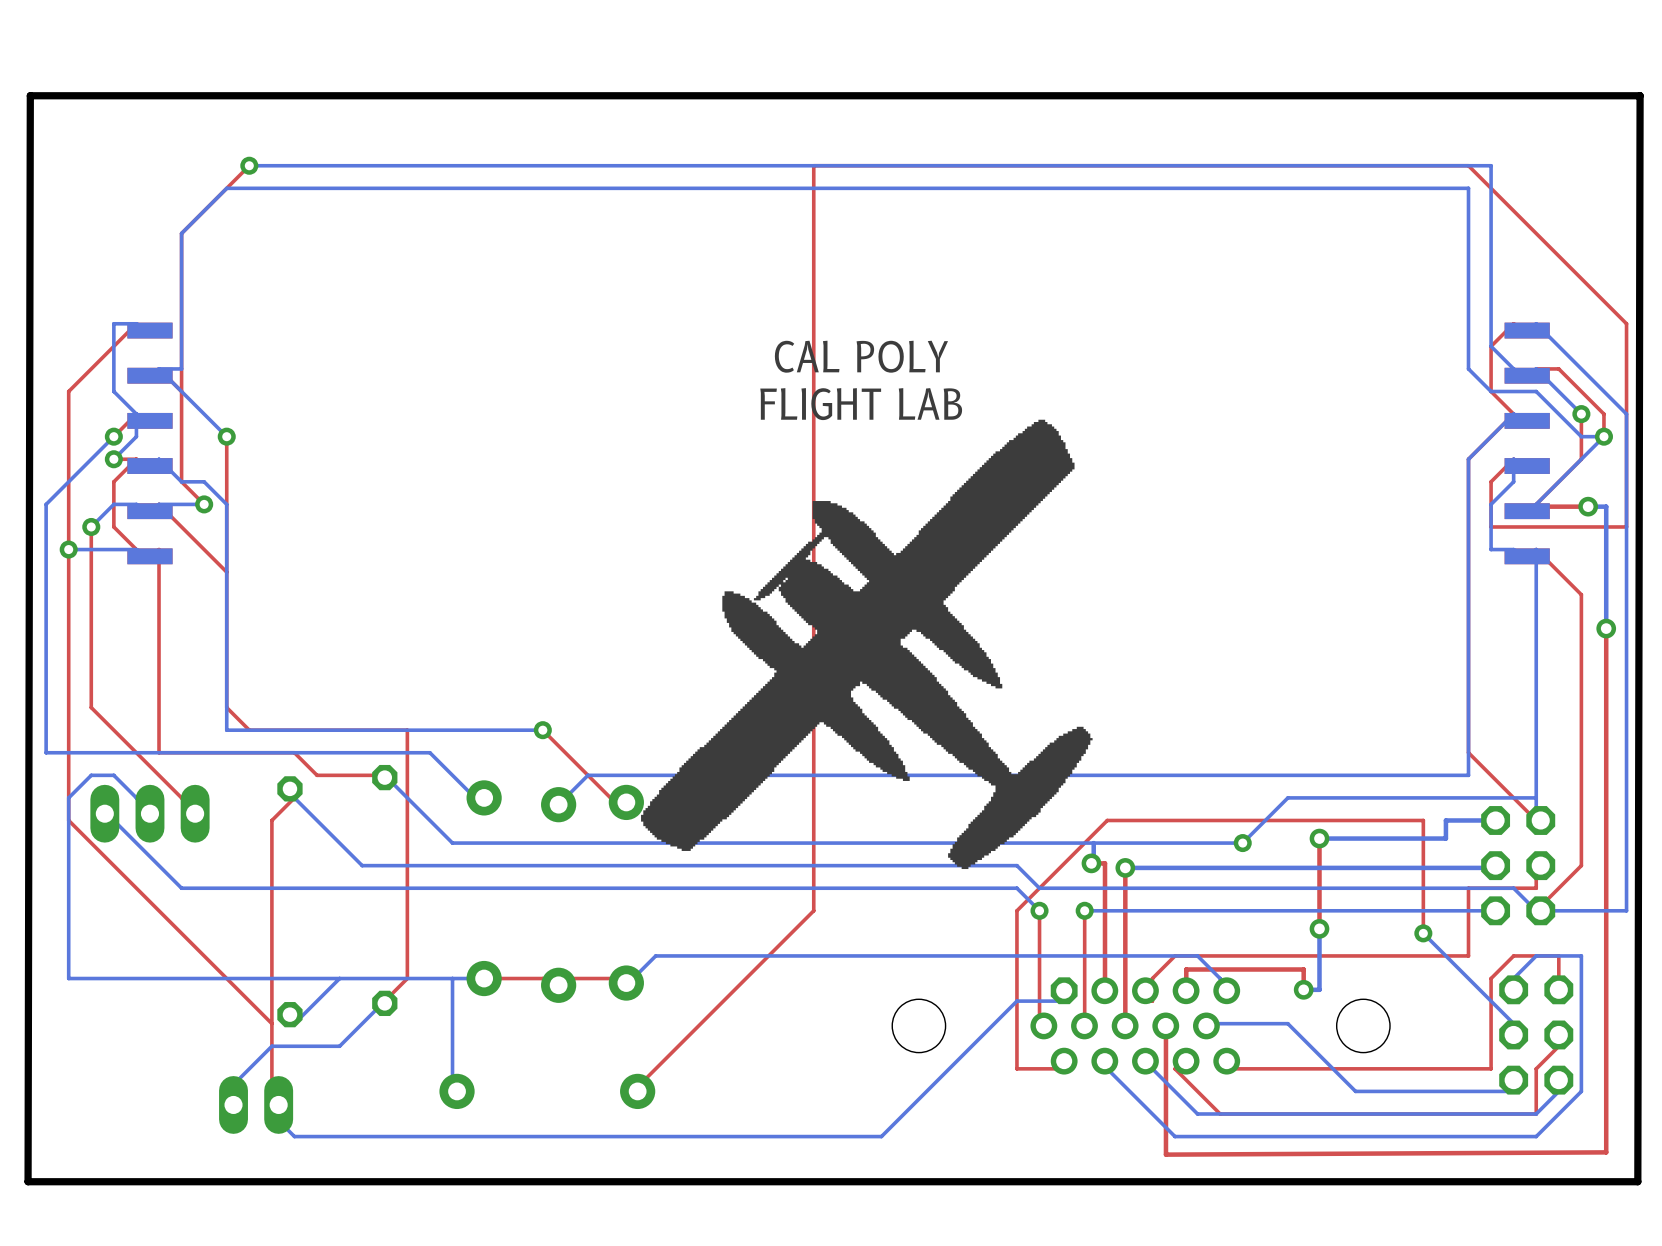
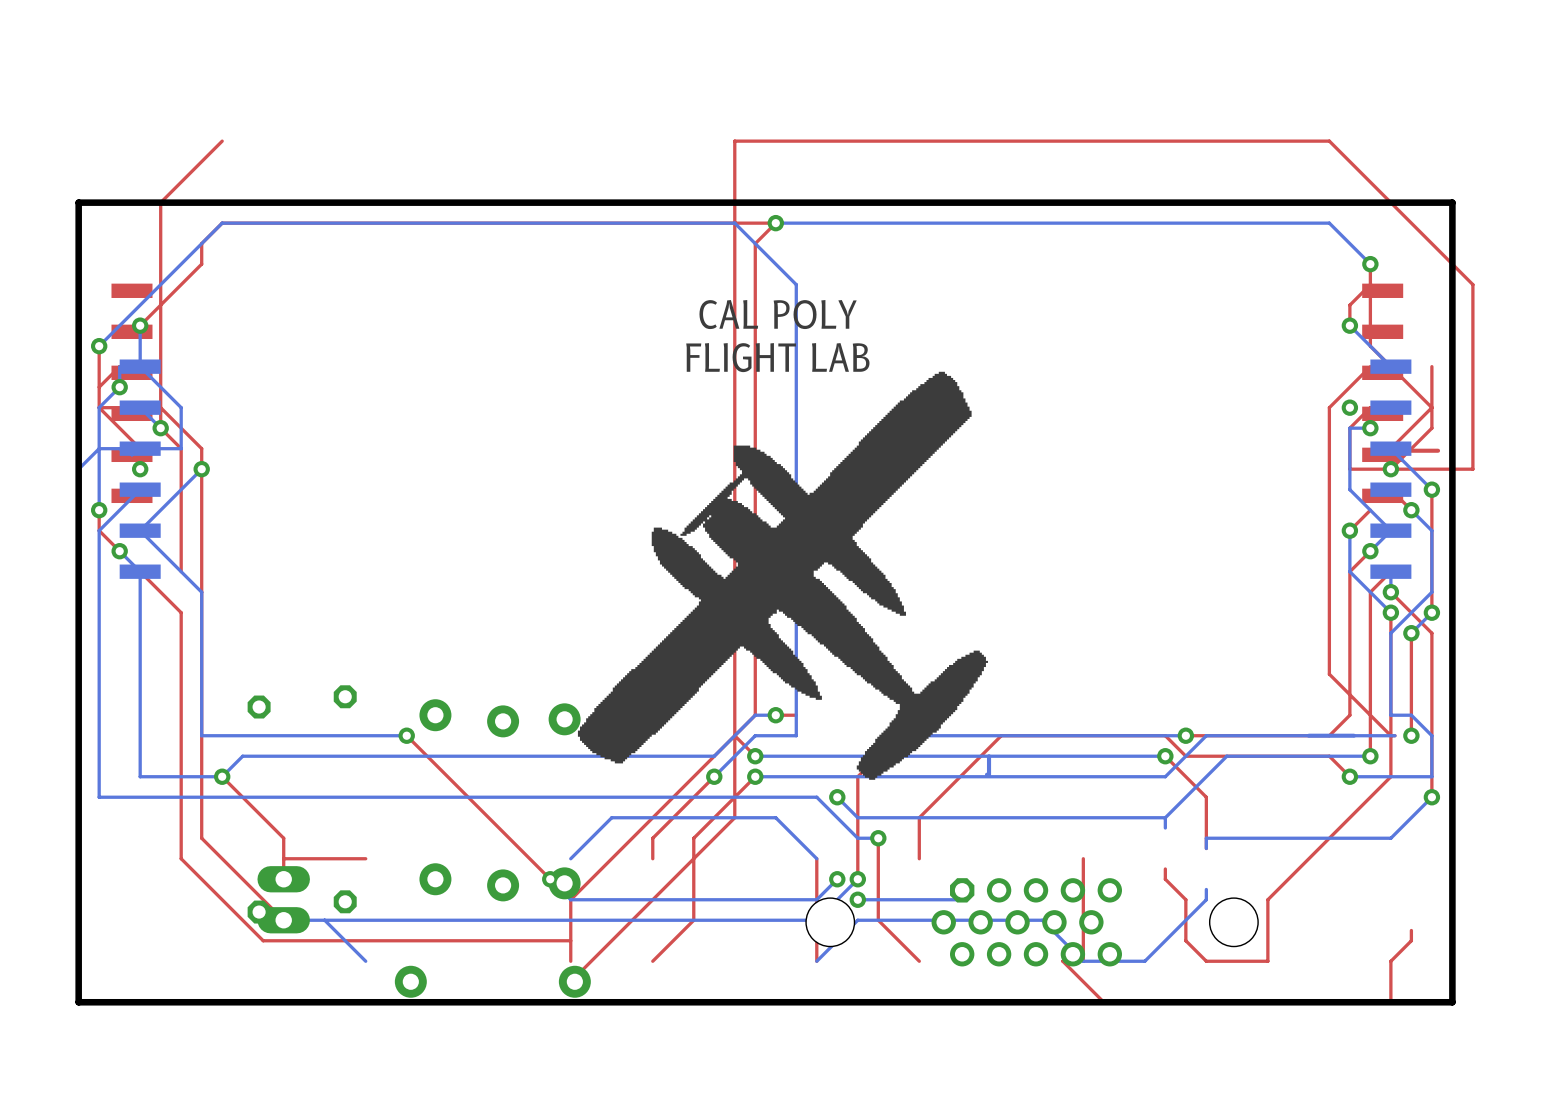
board edge: (1640, 95) (1637, 1181) (28, 1181) (30, 95) (1640, 95) -> (1452, 202) (1452, 1002) (78, 1002) (78, 202) (1452, 202)
bottom track: (249, 165) (1491, 165) (1491, 346) (1513, 368) (1527, 375) (1536, 368) (1581, 414) -> none
via: (249, 165) -> none
bottom track: none -> (775, 223) (1329, 223) (1370, 264)
via: none -> (775, 223)
top track: none -> (1370, 264) (1370, 346) (1431, 407) (1431, 428) (1390, 469) (1390, 448)
via: none -> (1370, 264)
top track: (149, 330) (136, 323) (68, 391) (68, 820) (204, 955) -> (140, 571) (181, 612) (181, 858)
bottom track: (149, 330) (136, 323) (113, 323) (113, 391) (136, 414) (149, 420) -> none
bottom track: (1527, 330) (1536, 323) (1626, 414) (1626, 910) (1536, 910) (1513, 888) (1039, 888) (1016, 865) -> none
top track: none -> (140, 325) (201, 264) (201, 243) (222, 223) (775, 223) (755, 243) (755, 715) (570, 899) (570, 961)
bottom track: (159, 368) (226, 436) -> (140, 325) (140, 366) (181, 407) (181, 448)
bottom track: (159, 368) (181, 368) (181, 233) (226, 188) (1468, 188) (1468, 368) (1491, 391) (1536, 391) (1581, 436) (1603, 436) (1527, 511) -> none
via: none -> (140, 325)
top track: (1491, 368) (1491, 391) (1513, 414) (1527, 420) -> none
bottom track: none -> (1349, 325) (1390, 366)
via: none -> (1349, 325)
top track: (1527, 375) (1536, 368) (1558, 368) (1603, 414) (1603, 436) -> none
top track: none -> (99, 346) (99, 407) (140, 448)
bottom track: none -> (99, 346) (222, 223) (734, 223) (796, 284) (796, 735) (755, 735) (714, 776)
via: none -> (99, 346)
via: (1581, 414) -> none
bottom track: (1527, 420) (1513, 414) (1468, 459) (1468, 775) (587, 775) (558, 804) -> none
bottom track: (113, 436) (46, 504) (46, 752) (429, 752) (475, 797) (484, 797) -> none
via: (113, 436) -> none
via: none -> (119, 387)
top track: (226, 436) (226, 504) -> (140, 407) (160, 407) (201, 448)
via: (226, 436) -> none
via: (1603, 436) -> none
part position: (149, 443) -> (140, 469)
part position: (1527, 443) -> (1390, 469)
bottom track: none -> (99, 407) (99, 510)
via: (113, 459) -> none
via: none -> (1349, 407)
top track: (149, 466) (136, 459) (113, 481) (113, 526) (136, 549) (149, 556) (159, 549) (159, 752) (294, 752) (317, 775) (384, 775) (384, 777) -> none
bottom track: (1527, 466) (1513, 459) (1513, 481) (1491, 504) -> (1370, 428) (1349, 428) (1349, 448)
bottom track: (181, 481) (204, 481) (226, 504) (226, 662) -> (201, 469) (140, 530) (201, 592)
via: none -> (160, 428)
via: none -> (1370, 428)
top track: none -> (181, 448) (181, 571)
via: (204, 504) -> none
bottom track: none -> (1390, 448) (1431, 489)
bottom track: (1588, 506) (1606, 506) (1606, 628) -> none
via: (1588, 506) -> none
top track: (149, 511) (159, 504) (226, 572) -> none
top track: (91, 526) (91, 707) (195, 813) -> none
via: (91, 526) -> none
via: none -> (140, 469)
via: none -> (201, 469)
via: none -> (1390, 469)
bottom track: (68, 549) (136, 549) (149, 556) -> none
via: (68, 549) -> none
bottom track: (1491, 549) (1513, 549) (1527, 556) (1536, 549) (1536, 639) -> (1349, 489) (1390, 530) (1370, 551)
via: none -> (1431, 489)
top track: none -> (99, 510) (99, 530) (119, 551)
via: none -> (99, 510)
top track: none -> (1370, 510) (1349, 530)
top track: (1558, 572) (1581, 594) -> (1431, 489) (1431, 530)
via: none -> (1411, 510)
bottom track: none -> (1349, 530) (1349, 571) (1390, 612)
via: none -> (1349, 530)
via: none -> (119, 551)
via: none -> (1370, 551)
top track: (1606, 628) (1606, 1152) (1165, 1154) (1165, 1025) -> none
via: (1606, 628) -> none
top track: none -> (1390, 571) (1370, 592) (1370, 756)
bottom track: (1536, 662) (1536, 707) -> (1411, 510) (1431, 530) (1431, 592) (1390, 633)
via: none -> (1390, 592)
via: none -> (1390, 612)
top track: (1581, 685) (1581, 707) -> (1390, 592) (1431, 633)
bottom track: none -> (1431, 612) (1411, 633)
via: none -> (1431, 612)
top track: (226, 707) (249, 730) (407, 730) (407, 978) (384, 1001) (384, 1003) -> (201, 633) (201, 838) (283, 920)
top track: none -> (1411, 633) (1411, 735)
via: none -> (1411, 633)
top track: (542, 730) (610, 797) (626, 802) -> none
bottom track: (542, 730) (226, 730) -> (406, 735) (201, 735) (201, 653)
via: (542, 730) -> none
bottom track: (384, 777) (384, 775) (452, 843) -> (119, 551) (140, 571) (140, 776) (222, 776) (242, 756) (406, 756)
top track: (289, 788) (294, 797) (271, 820) (271, 1091) (278, 1104) -> none
bottom track: (289, 788) (294, 797) (362, 865) (836, 865) -> none
via: none -> (775, 715)
top track: none -> (796, 715) (775, 715)
bottom track: none -> (1390, 715) (1411, 715) (1431, 735) (1431, 776) (1349, 776)
bottom track: (104, 813) (181, 888) -> (140, 489) (99, 530) (99, 797) (160, 797)
bottom track: (149, 813) (113, 775) (91, 775) (68, 797) (68, 978) (484, 978) -> none
part: (149, 813) -> none
top track: none -> (406, 735) (550, 879)
via: none -> (406, 735)
top track: none -> (734, 735) (755, 756)
top track: none -> (898, 735) (857, 776) (857, 879)
top track: (1310, 820) (1287, 820) -> (1349, 776) (1329, 756) (1185, 756) (1165, 735)
bottom track: none -> (1185, 735) (898, 735)
via: none -> (1185, 735)
top track: (1423, 820) (1423, 933) -> (1288, 735) (1329, 735) (1349, 715) (1349, 571) (1370, 551)
bottom track: (1445, 820) (1445, 838) (1319, 838) -> (1308, 735) (1206, 735) (1165, 776) (919, 776)
bottom track: (1536, 820) (1536, 797) (1287, 797) (1242, 843) -> (1165, 756) (1124, 756)
bottom track: none -> (1390, 735) (1353, 735)
via: none -> (1411, 735)
top track: (1319, 838) (1319, 928) -> none
via: (1319, 838) -> none
bottom track: (836, 843) (791, 843) -> (775, 715) (755, 715) (714, 756)
via: none -> (755, 756)
via: (1242, 843) -> none
top track: none -> (1165, 756) (1206, 797) (1206, 848)
via: none -> (1165, 756)
bottom track: none -> (1370, 756) (1226, 756) (1165, 817) (1165, 827)
via: none -> (1370, 756)
top track: (1091, 863) (1105, 863) (1105, 990) -> none
via: (1091, 863) -> none
top track: none -> (222, 776) (283, 838) (283, 879)
via: none -> (222, 776)
top track: none -> (714, 776) (652, 838) (652, 858)
via: none -> (714, 776)
top track: none -> (755, 776) (693, 838) (693, 920) (652, 961)
via: none -> (755, 776)
via: none -> (1349, 776)
bottom track: (1495, 865) (1495, 867) (1125, 867) -> none
part: (1518, 865) -> none
top track: (1540, 865) (1536, 865) (1536, 888) (1468, 888) (1468, 955) (1174, 955) (1152, 978) (1152, 1001) (1145, 990) -> none
top track: (1581, 865) (1536, 910) (1540, 910) -> (1431, 776) (1431, 797)
top track: (1125, 867) (1125, 1025) -> none
via: (1125, 867) -> none
bottom track: (904, 888) (1016, 888) (1039, 910) -> (816, 797) (857, 838) (878, 838)
bottom track: none -> (837, 797) (857, 817) (980, 817)
via: none -> (837, 797)
bottom track: none -> (1431, 797) (1390, 838) (1206, 838) (1206, 848)
via: none -> (1431, 797)
top track: (1039, 910) (1039, 1023) (1043, 1025) -> none
via: (1039, 910) -> none
top track: (1084, 910) (1084, 1025) -> none
via: (1084, 910) -> none
bottom track: (1495, 910) (1287, 910) -> none
bottom track: (1319, 928) (1319, 989) (1303, 989) -> none
via: (1319, 928) -> none
top track: none -> (878, 838) (878, 920) (919, 961)
via: none -> (878, 838)
bottom track: (1423, 933) (1513, 1023) (1513, 1034) -> none
via: (1423, 933) -> none
top track: none -> (365, 858) (283, 858)
top track: none -> (816, 858) (816, 961)
bottom track: none -> (816, 858) (775, 817) (611, 817) (570, 858)
top track: (1016, 955) (1016, 1068) (1062, 1068) (1064, 1061) -> none
top track: none -> (1083, 858) (1083, 961)
bottom track: (339, 978) (294, 1023) (289, 1014) -> none
bottom track: (452, 978) (452, 1091) (457, 1091) -> none
top track: (484, 978) (542, 978) (558, 985) (565, 978) (610, 978) (626, 983) -> none
via: none -> (550, 879)
bottom track: none -> (837, 879) (816, 899) (570, 899) (550, 879)
via: none -> (837, 879)
bottom track: none -> (857, 879) (816, 920) (283, 920)
via: none -> (857, 879)
bottom track: (626, 983) (655, 955) (1197, 955) (1220, 978) (1226, 990) -> none
top track: (1303, 989) (1303, 969) (1186, 969) (1186, 990) -> none
via: (1303, 989) -> none
bottom track: none -> (1206, 889) (1206, 899) (1144, 961) (1083, 961) (1042, 920) (857, 920) (816, 961)
bottom track: (1513, 989) (1513, 978) (1536, 955) (1581, 955) (1581, 1091) (1536, 1136) (1174, 1136) (1107, 1068) (1104, 1061) -> none
top track: (1558, 989) (1558, 955) (1513, 955) (1491, 978) (1491, 1068) (1400, 1068) -> (1390, 612) (1390, 776) (1267, 899) (1267, 961)
via: none -> (857, 899)
bottom track: (1016, 1001) (881, 1136) (294, 1136) (271, 1113) (278, 1104) -> (919, 899) (857, 899)
bottom track: (384, 1003) (384, 1001) (339, 1046) (271, 1046) (226, 1091) (233, 1104) -> none
top track: none -> (242, 920) (263, 940) (570, 940)
bottom track: none -> (324, 920) (365, 961)
bottom track: (1206, 1025) (1197, 1023) (1287, 1023) (1355, 1091) (1513, 1091) (1513, 1080) -> none
part: (1536, 1034) -> none
bottom track: (1145, 1061) (1197, 1113) (1536, 1113) (1558, 1091) (1558, 1080) -> none
top track: (1226, 1061) (1220, 1068) (1333, 1068) -> (1165, 868) (1165, 879) (1185, 899) (1185, 940) (1206, 961)
part rotation: 0° (256, 1104) -> 90° clockwise (283, 899)
part position: (256, 1104) -> (283, 899)

